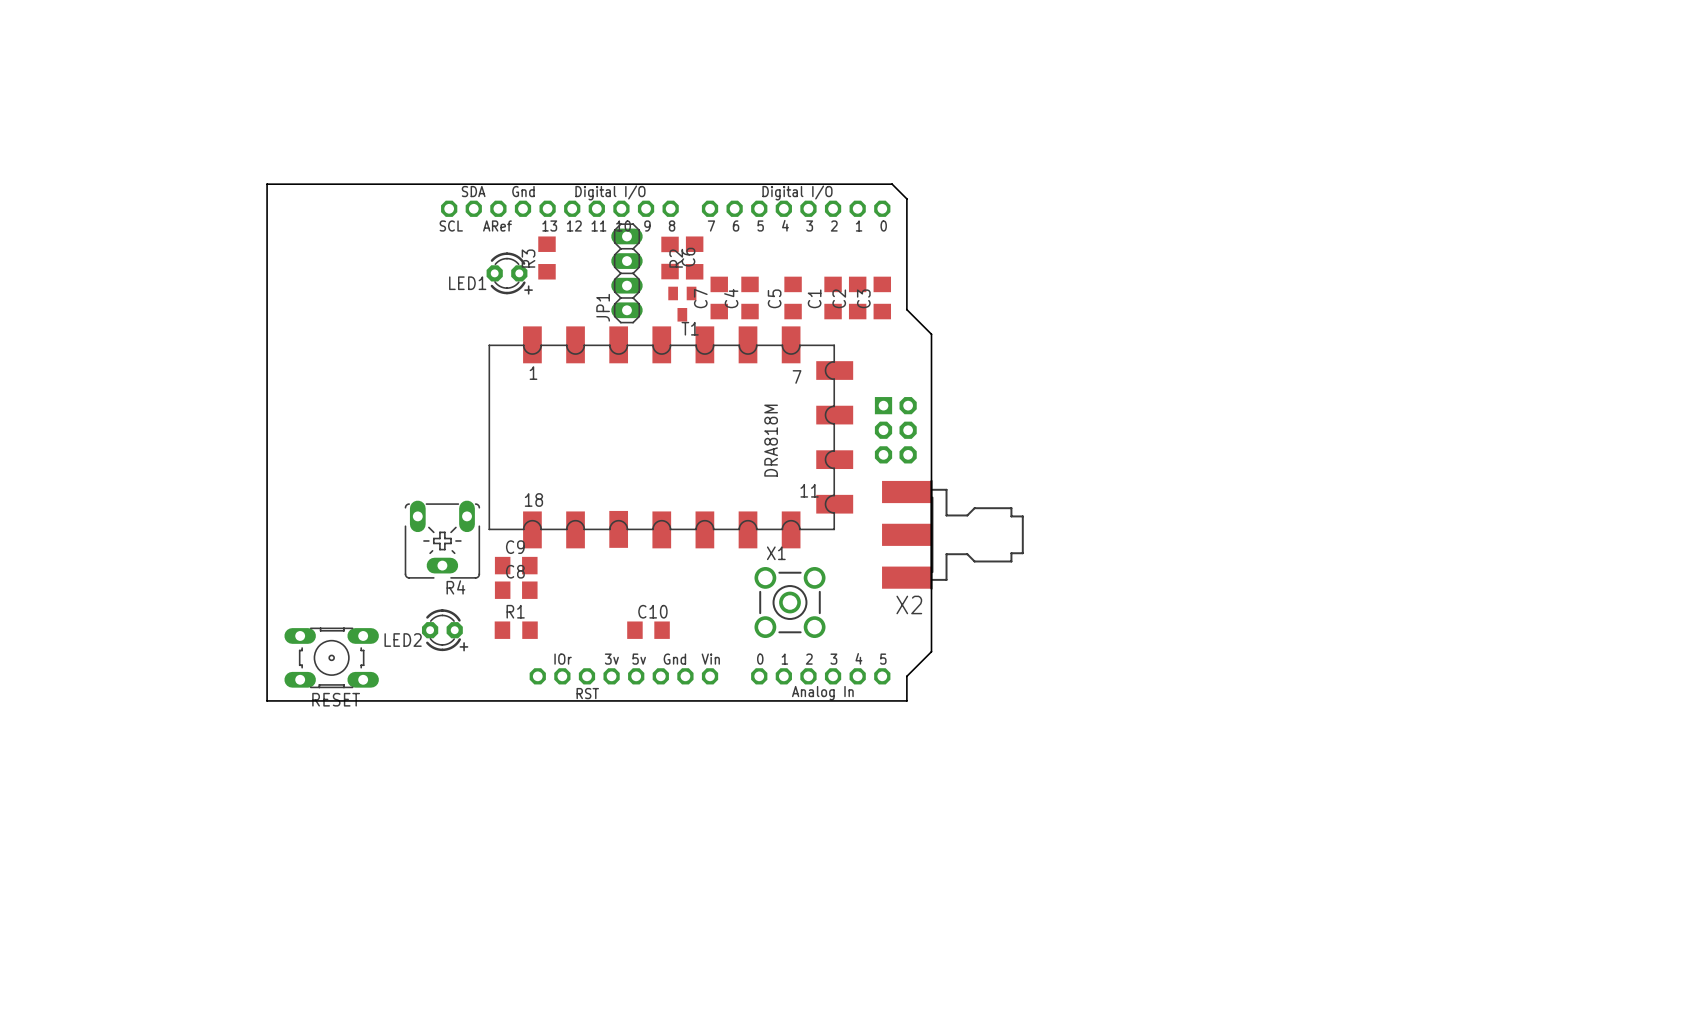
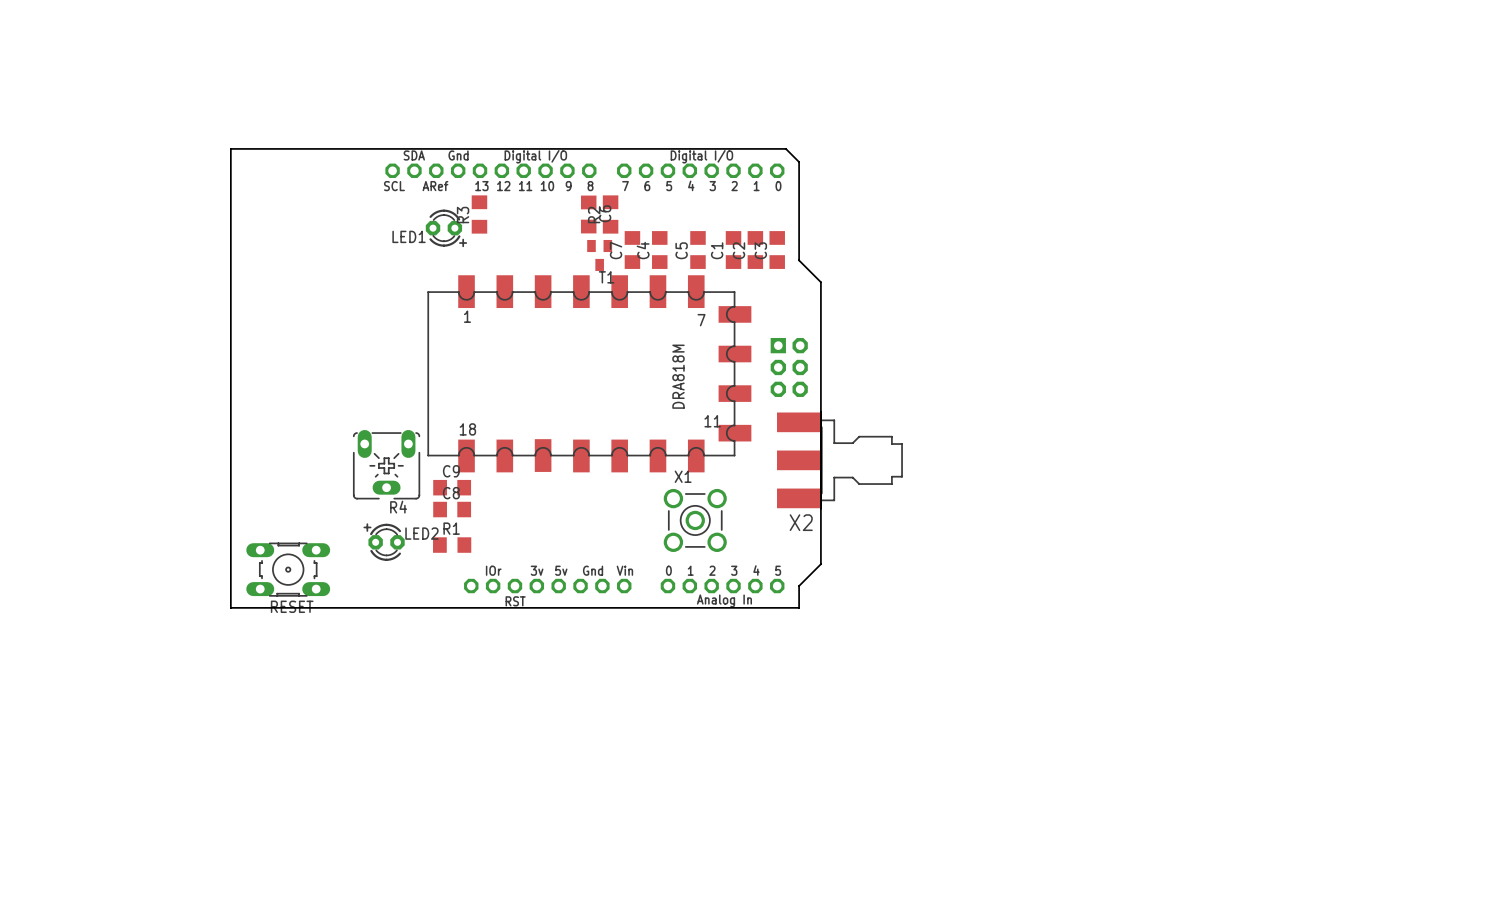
JP1: (626, 273) -> none
LED2 rotation: 0° (445, 630) -> 180° (384, 542)
C10: (648, 630) -> none

